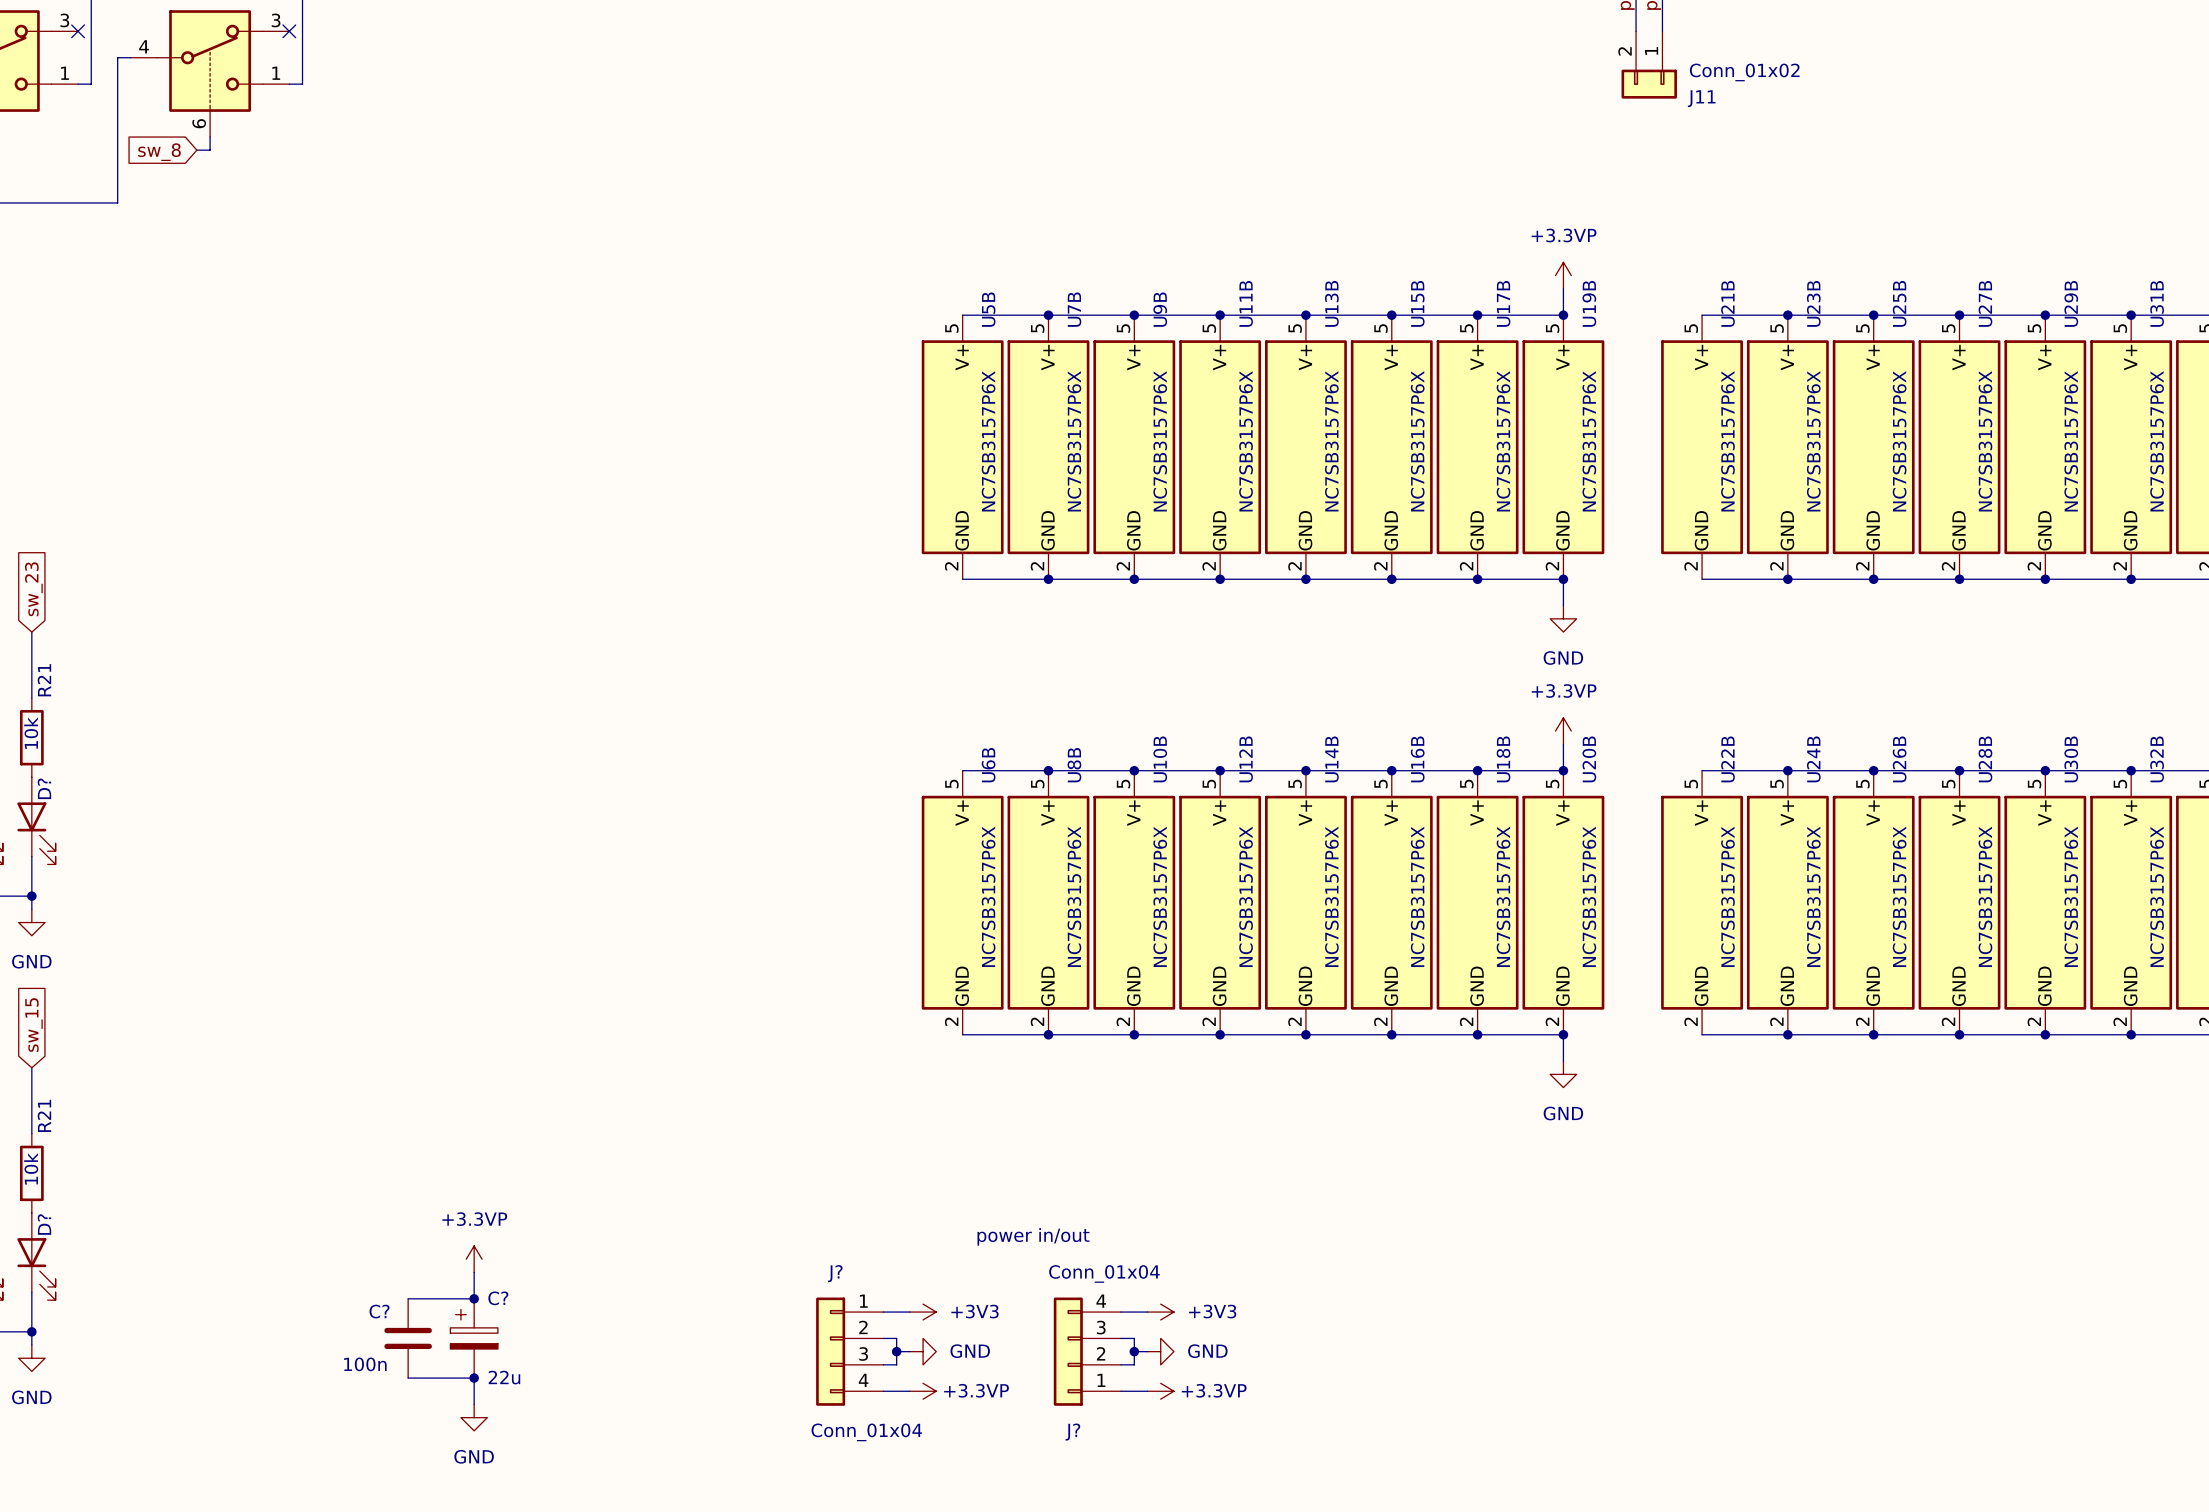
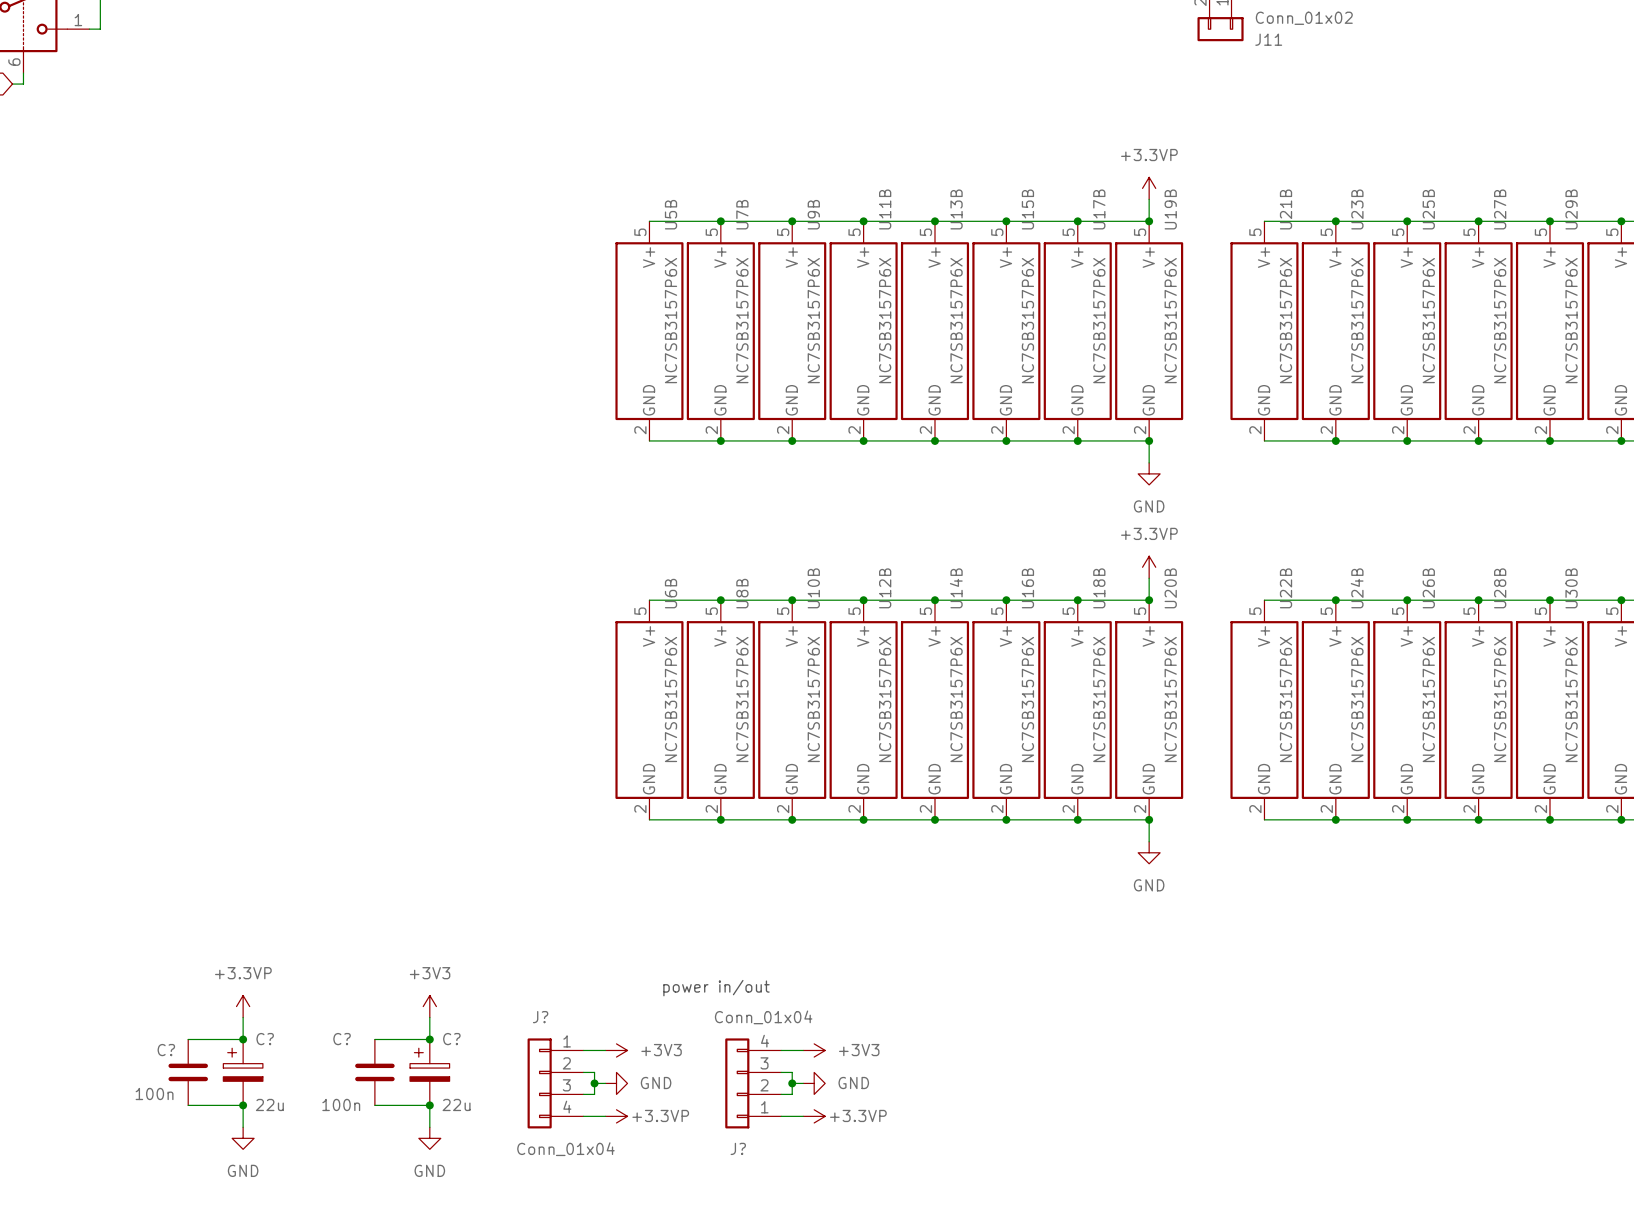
power symbol: none -> +3V3 (429, 1006)
wire: none -> (429, 1017) (429, 1039) (374, 1039)
junction: none -> (429, 1039)
C?: none -> 100n (374, 1072)
C?: none -> 22u (429, 1072)
wire: none -> (374, 1105) (429, 1105) (429, 1127)
junction: none -> (429, 1105)
power symbol: none -> GND (429, 1138)

